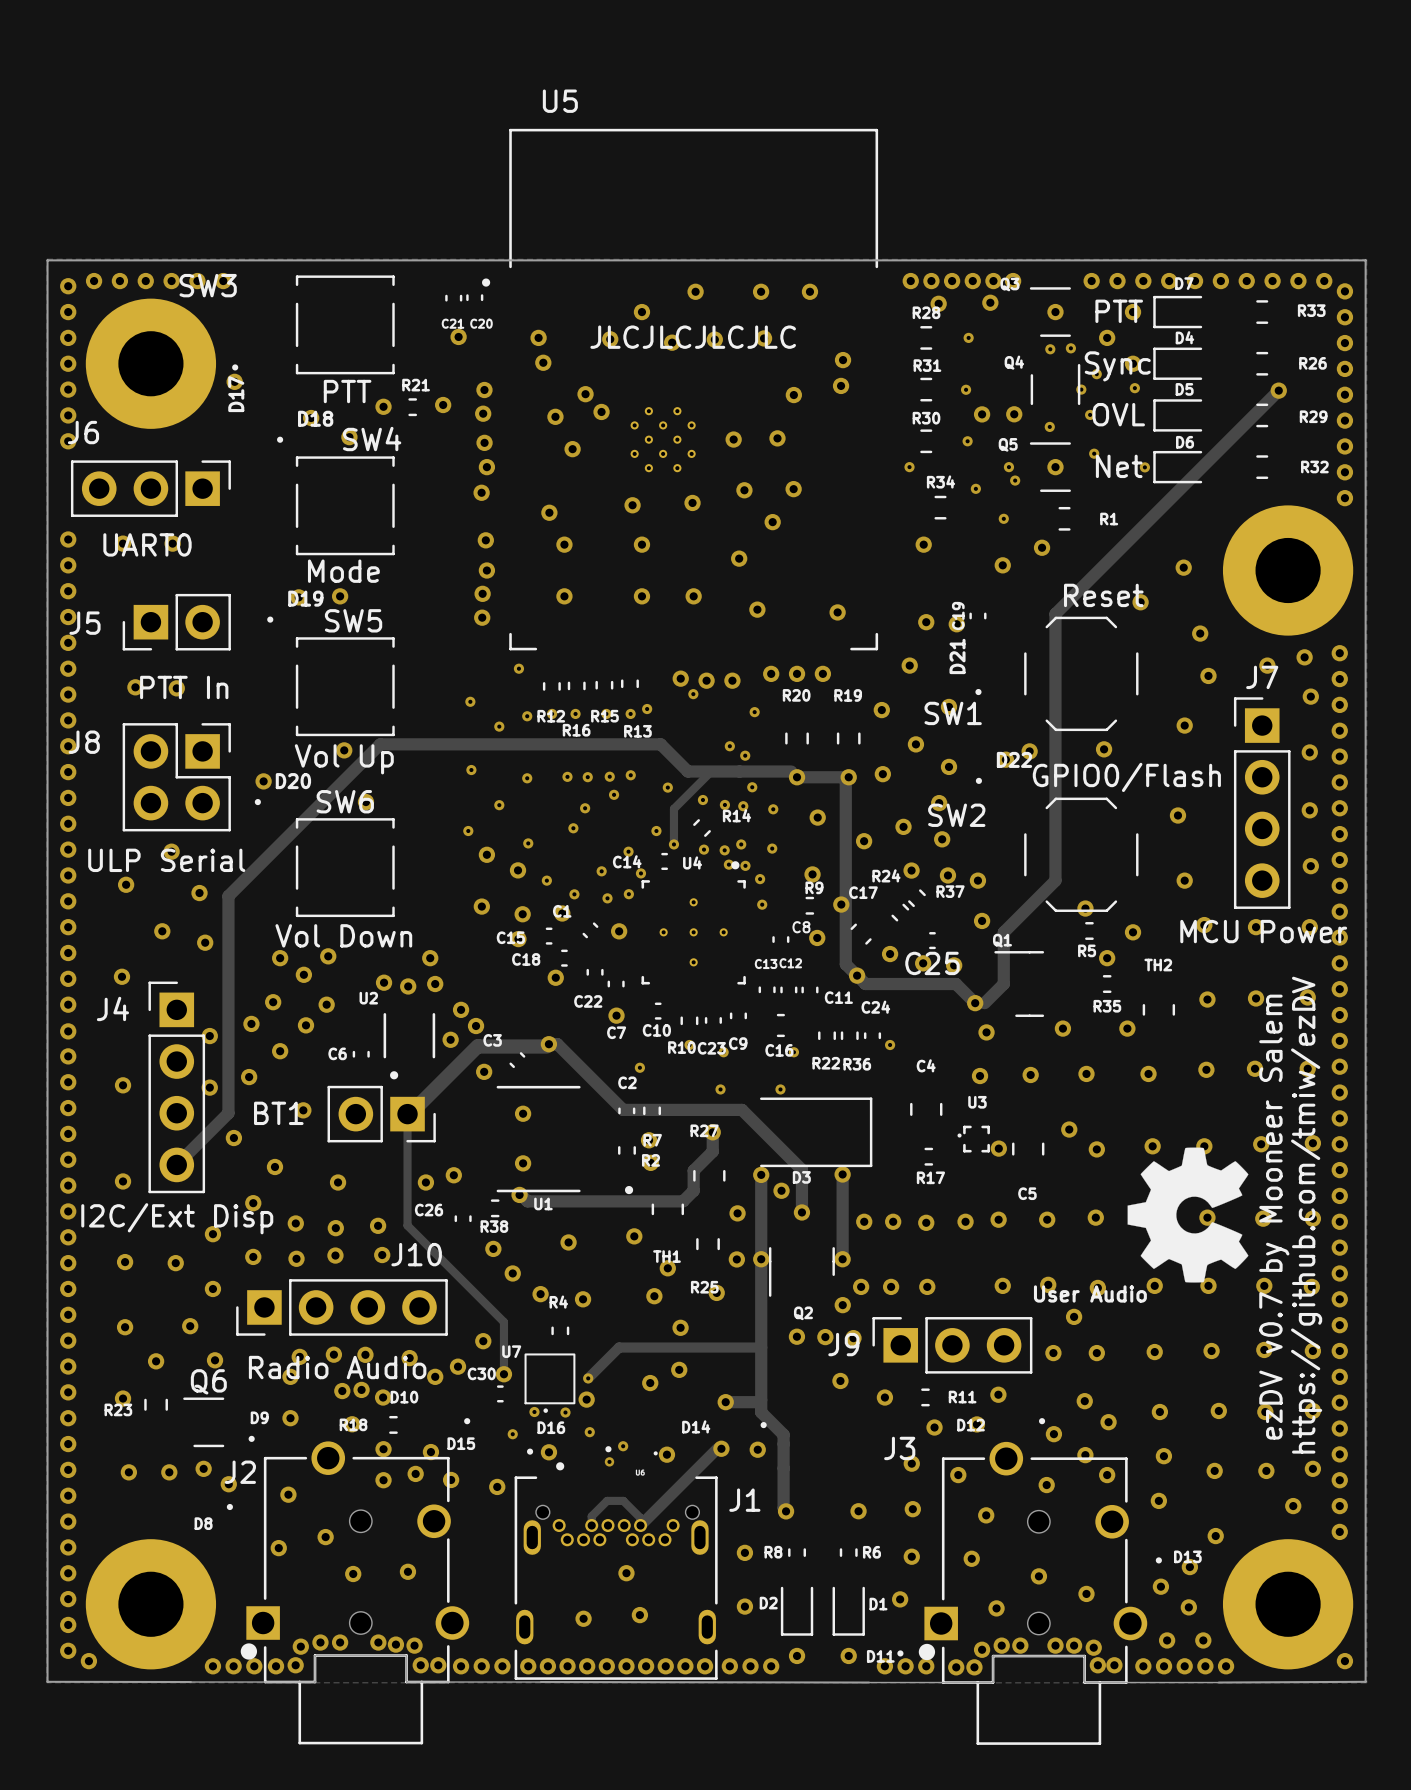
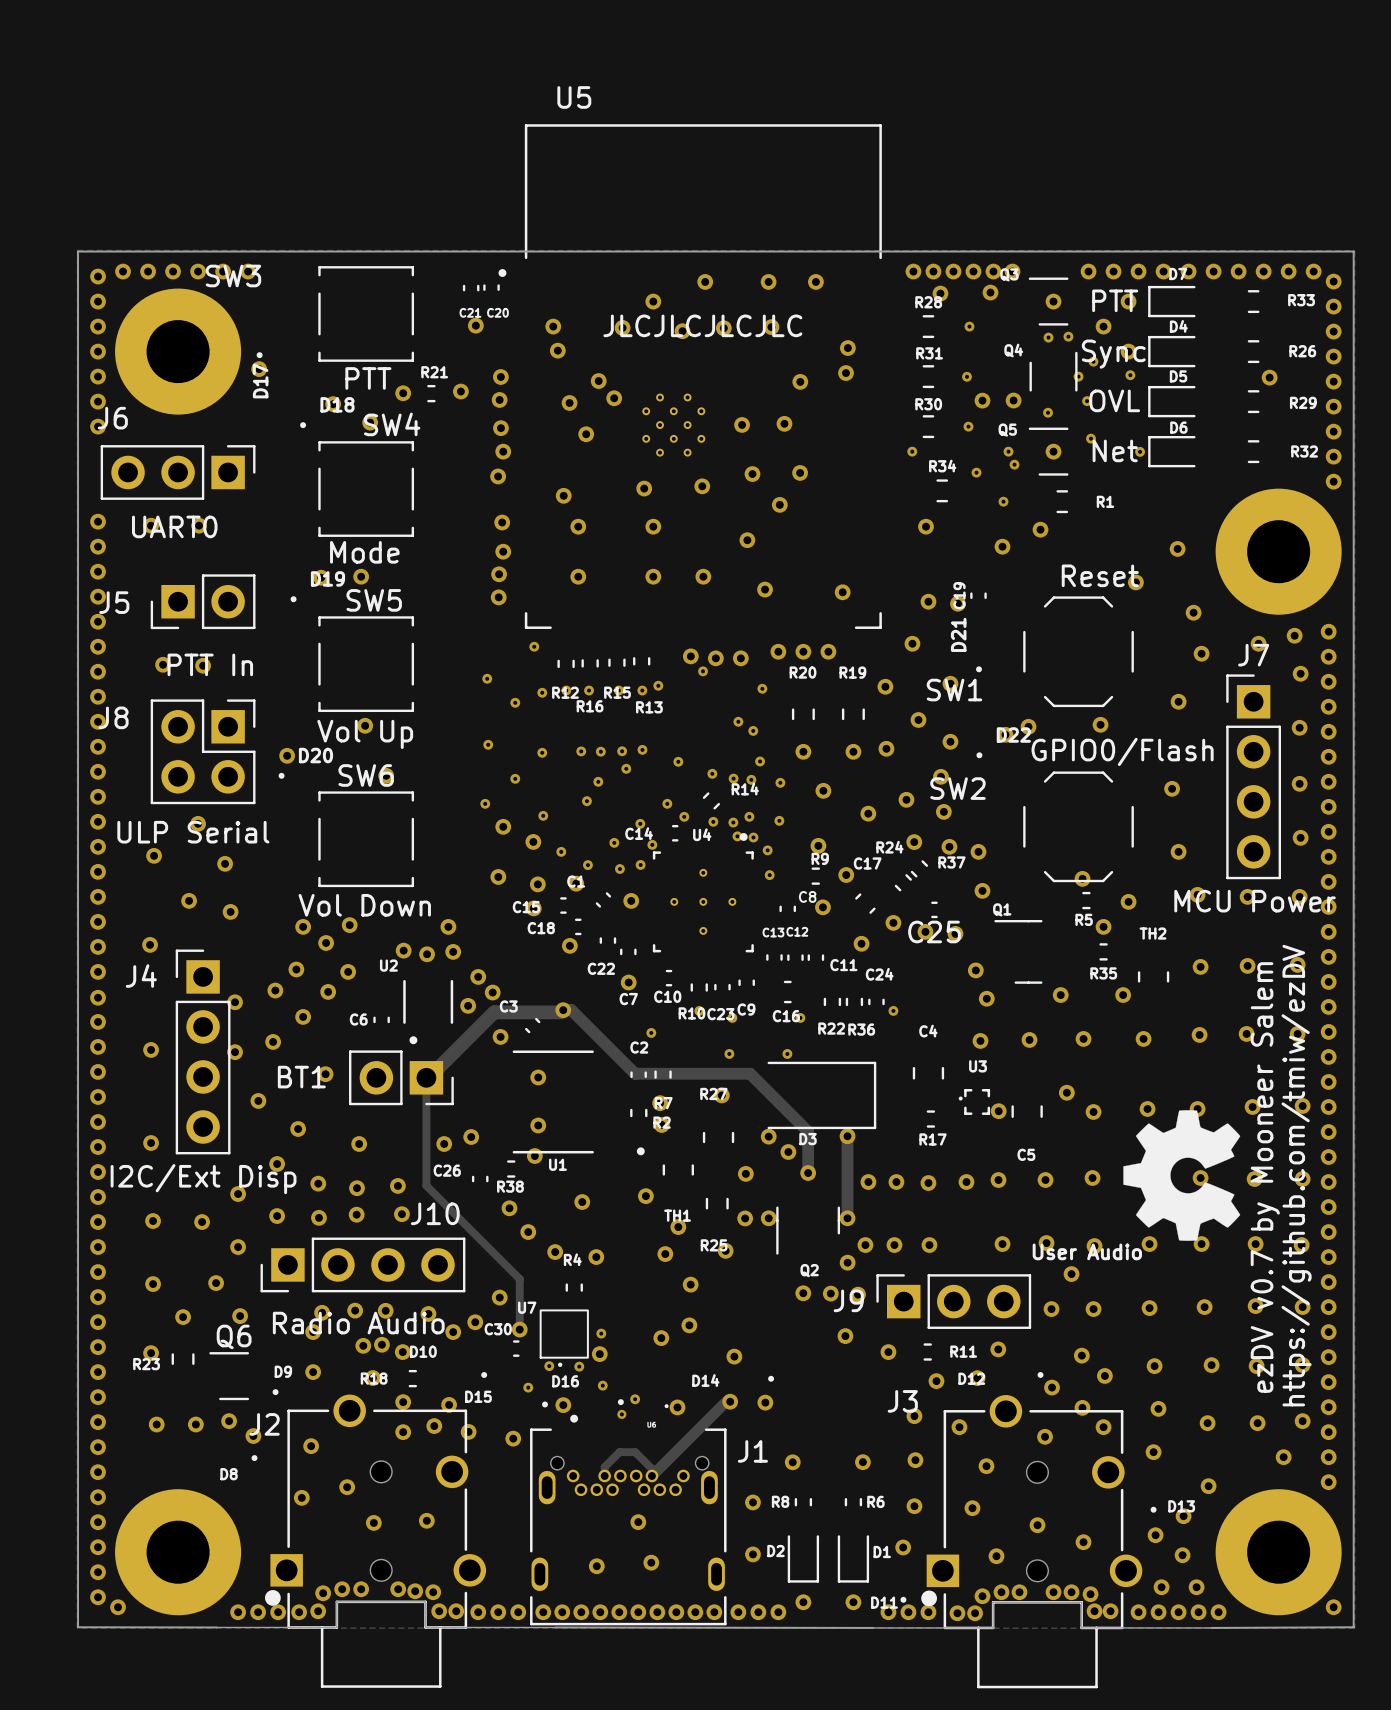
track: (1279, 390) (1055, 613) (1055, 880) (1003, 932) (1003, 984) (984, 1003) (975, 1003) (956, 984) (865, 984) (845, 964) (845, 780) (848, 777) (797, 777) (791, 771) (687, 771) (660, 744) (380, 744) (228, 896) (228, 1113) (176, 1164) -> none
track: (711, 771) (673, 808) (673, 839) -> none
track: (712, 1132) (712, 1151) (693, 1170) (693, 1190) (683, 1201) (527, 1201) (521, 1194) -> none
track: (761, 1174) (761, 1412) (783, 1434) (783, 1508) (786, 1511) -> none
track: (761, 1347) (619, 1347) (588, 1378) -> none
track: (761, 1399) (759, 1402) (725, 1402) -> none

